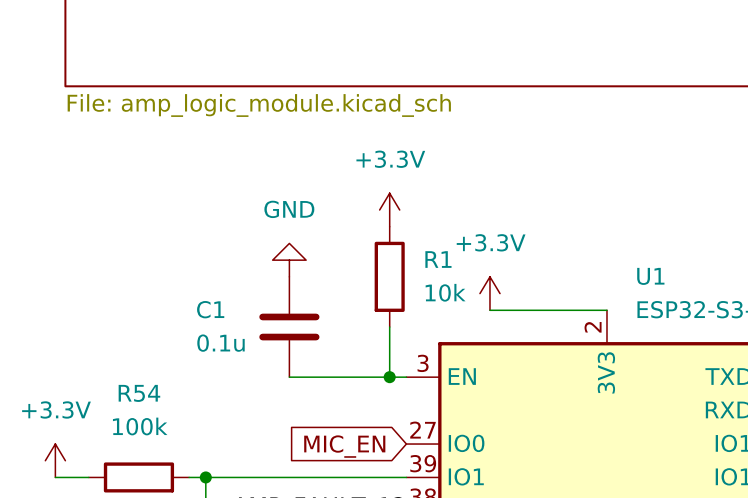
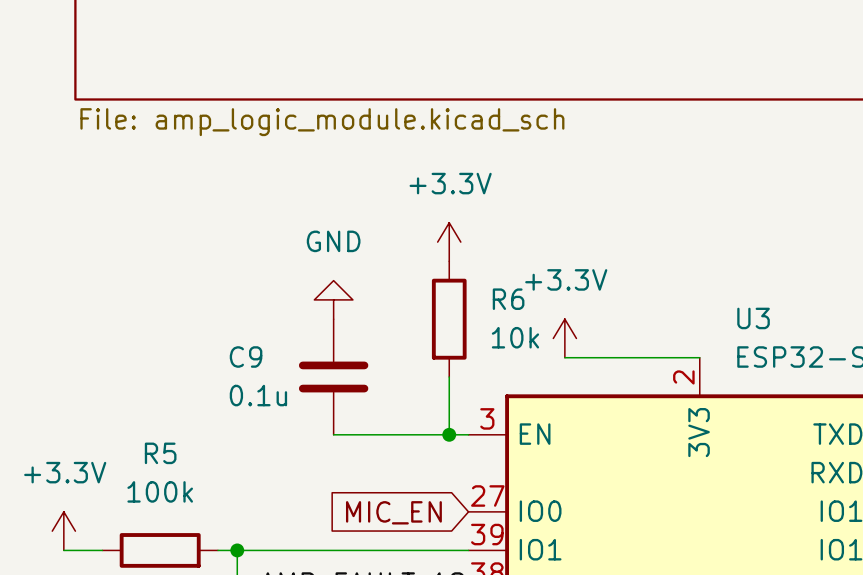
R1 name: R1 (438, 259) -> R6 (508, 299)
U1 name: U1 (650, 276) -> U3 (753, 318)
C1 name: C1 (210, 309) -> C9 (246, 357)
R54 name: R54 (139, 393) -> R5 (160, 453)

